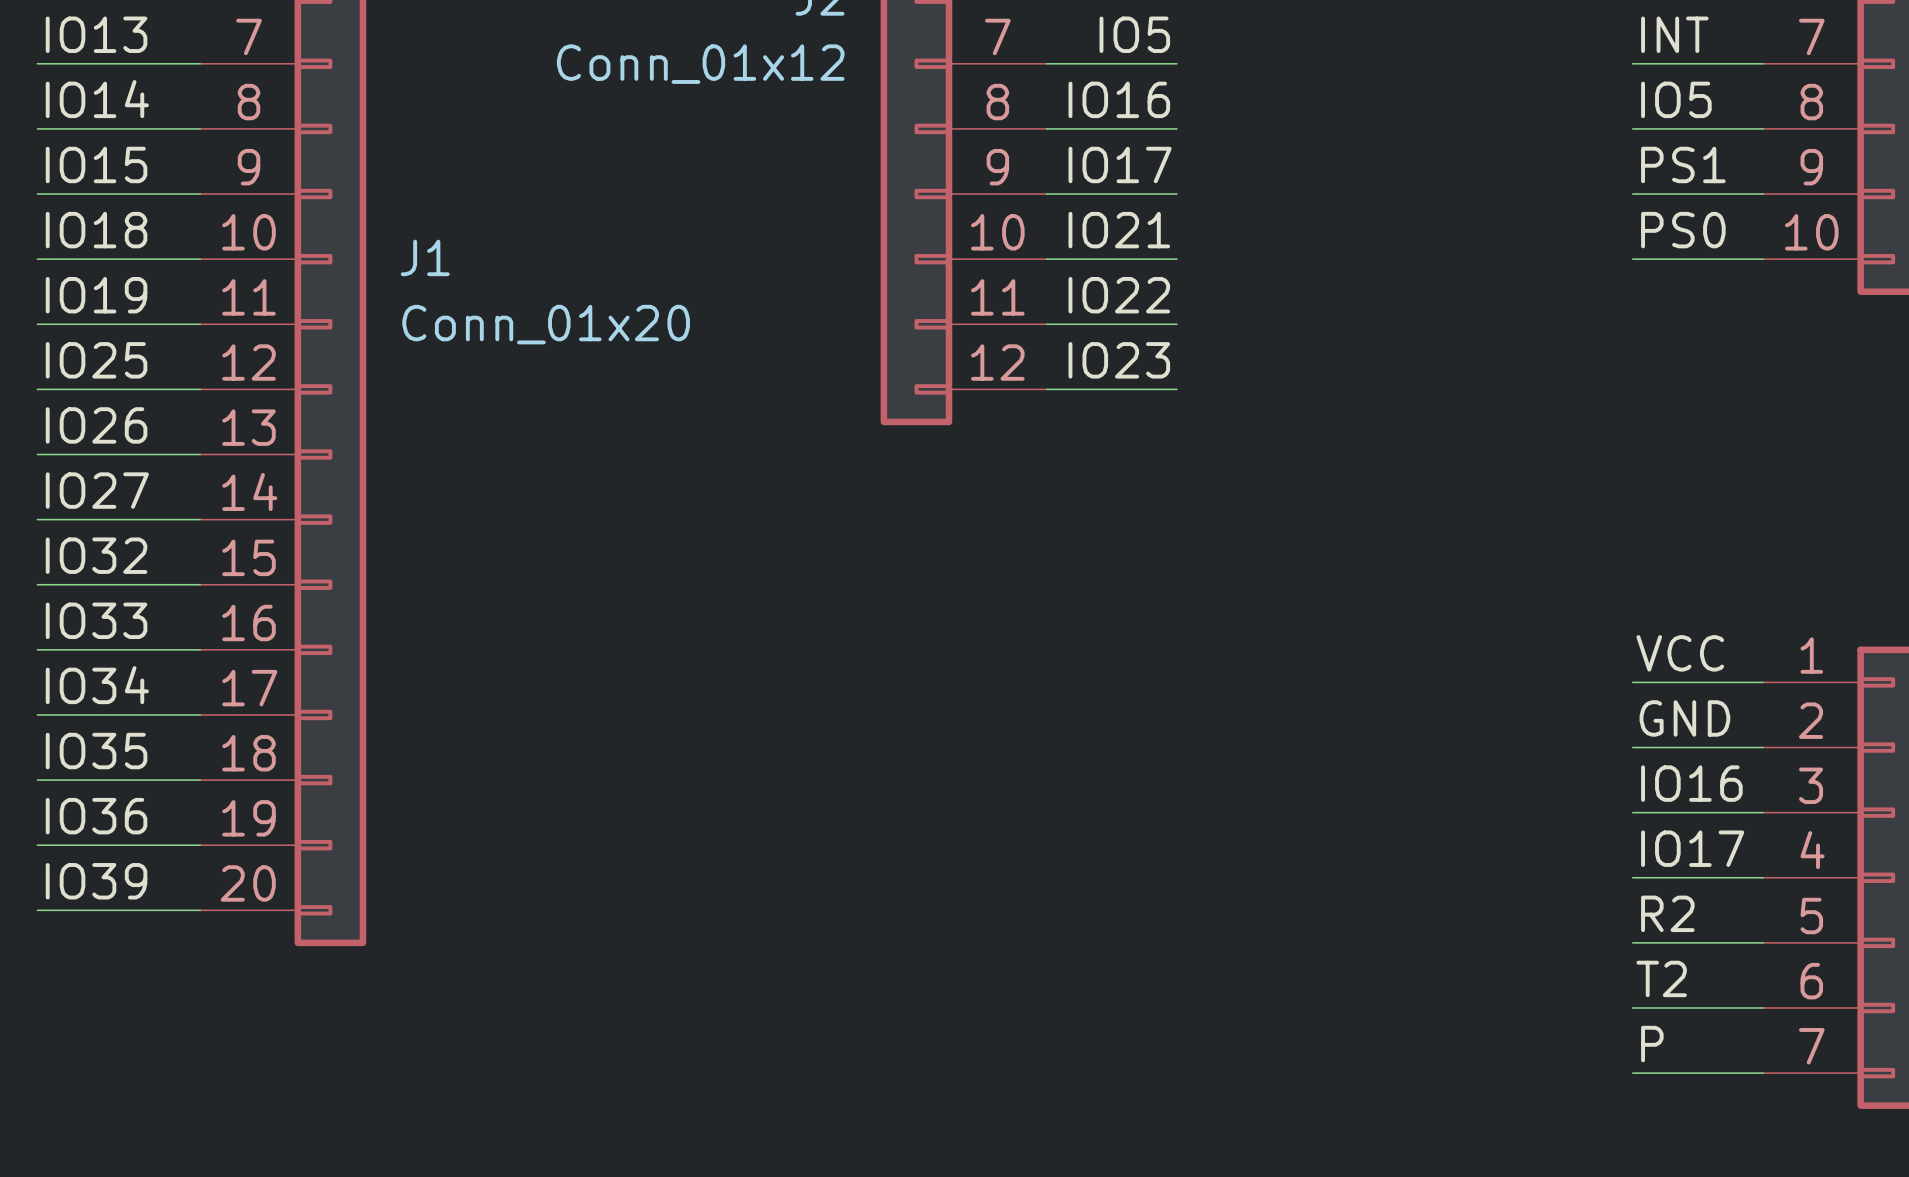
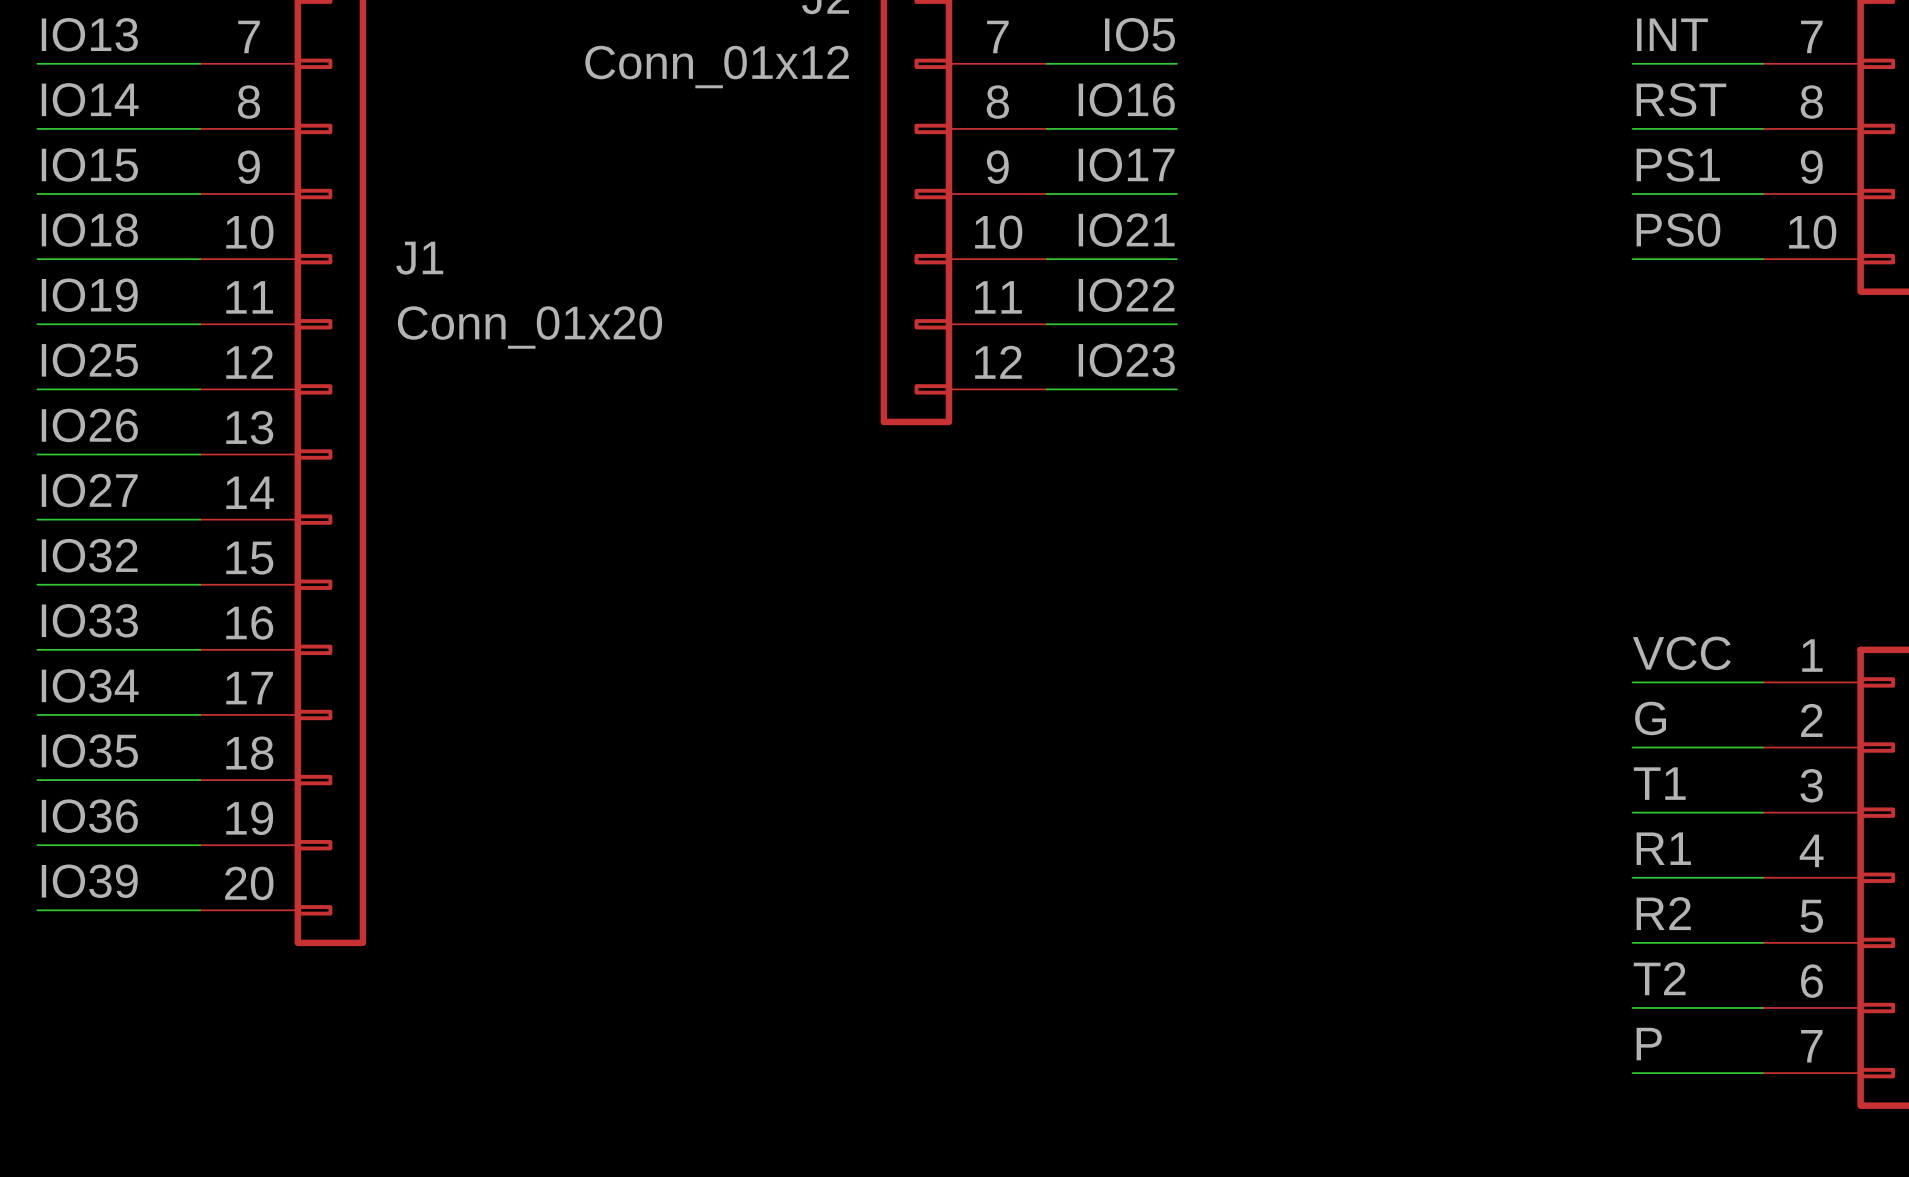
label: IO5 (1676, 99) -> RST (1681, 99)
label: GND (1684, 718) -> G (1650, 718)
label: IO16 (1691, 783) -> T1 (1659, 783)
label: IO17 (1692, 848) -> R1 (1663, 848)

